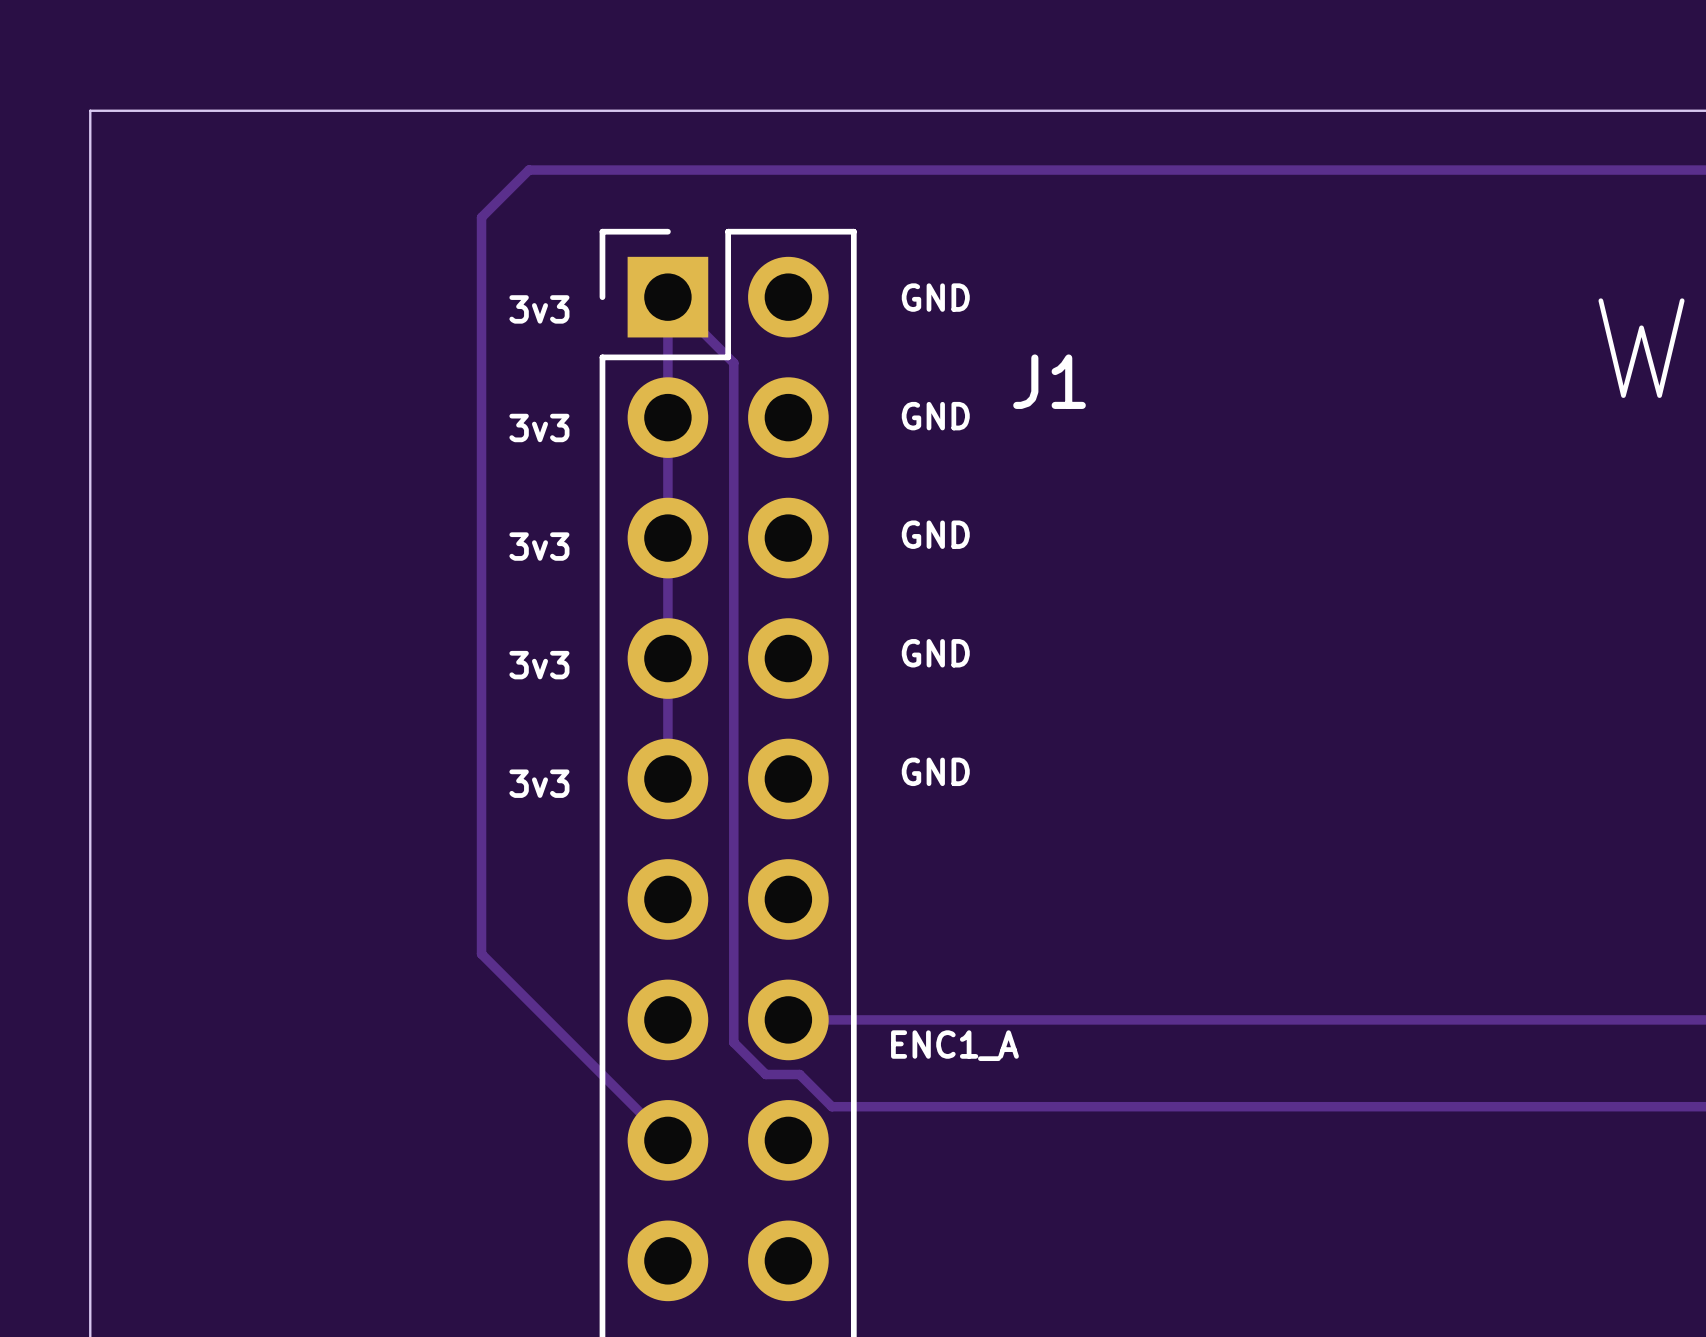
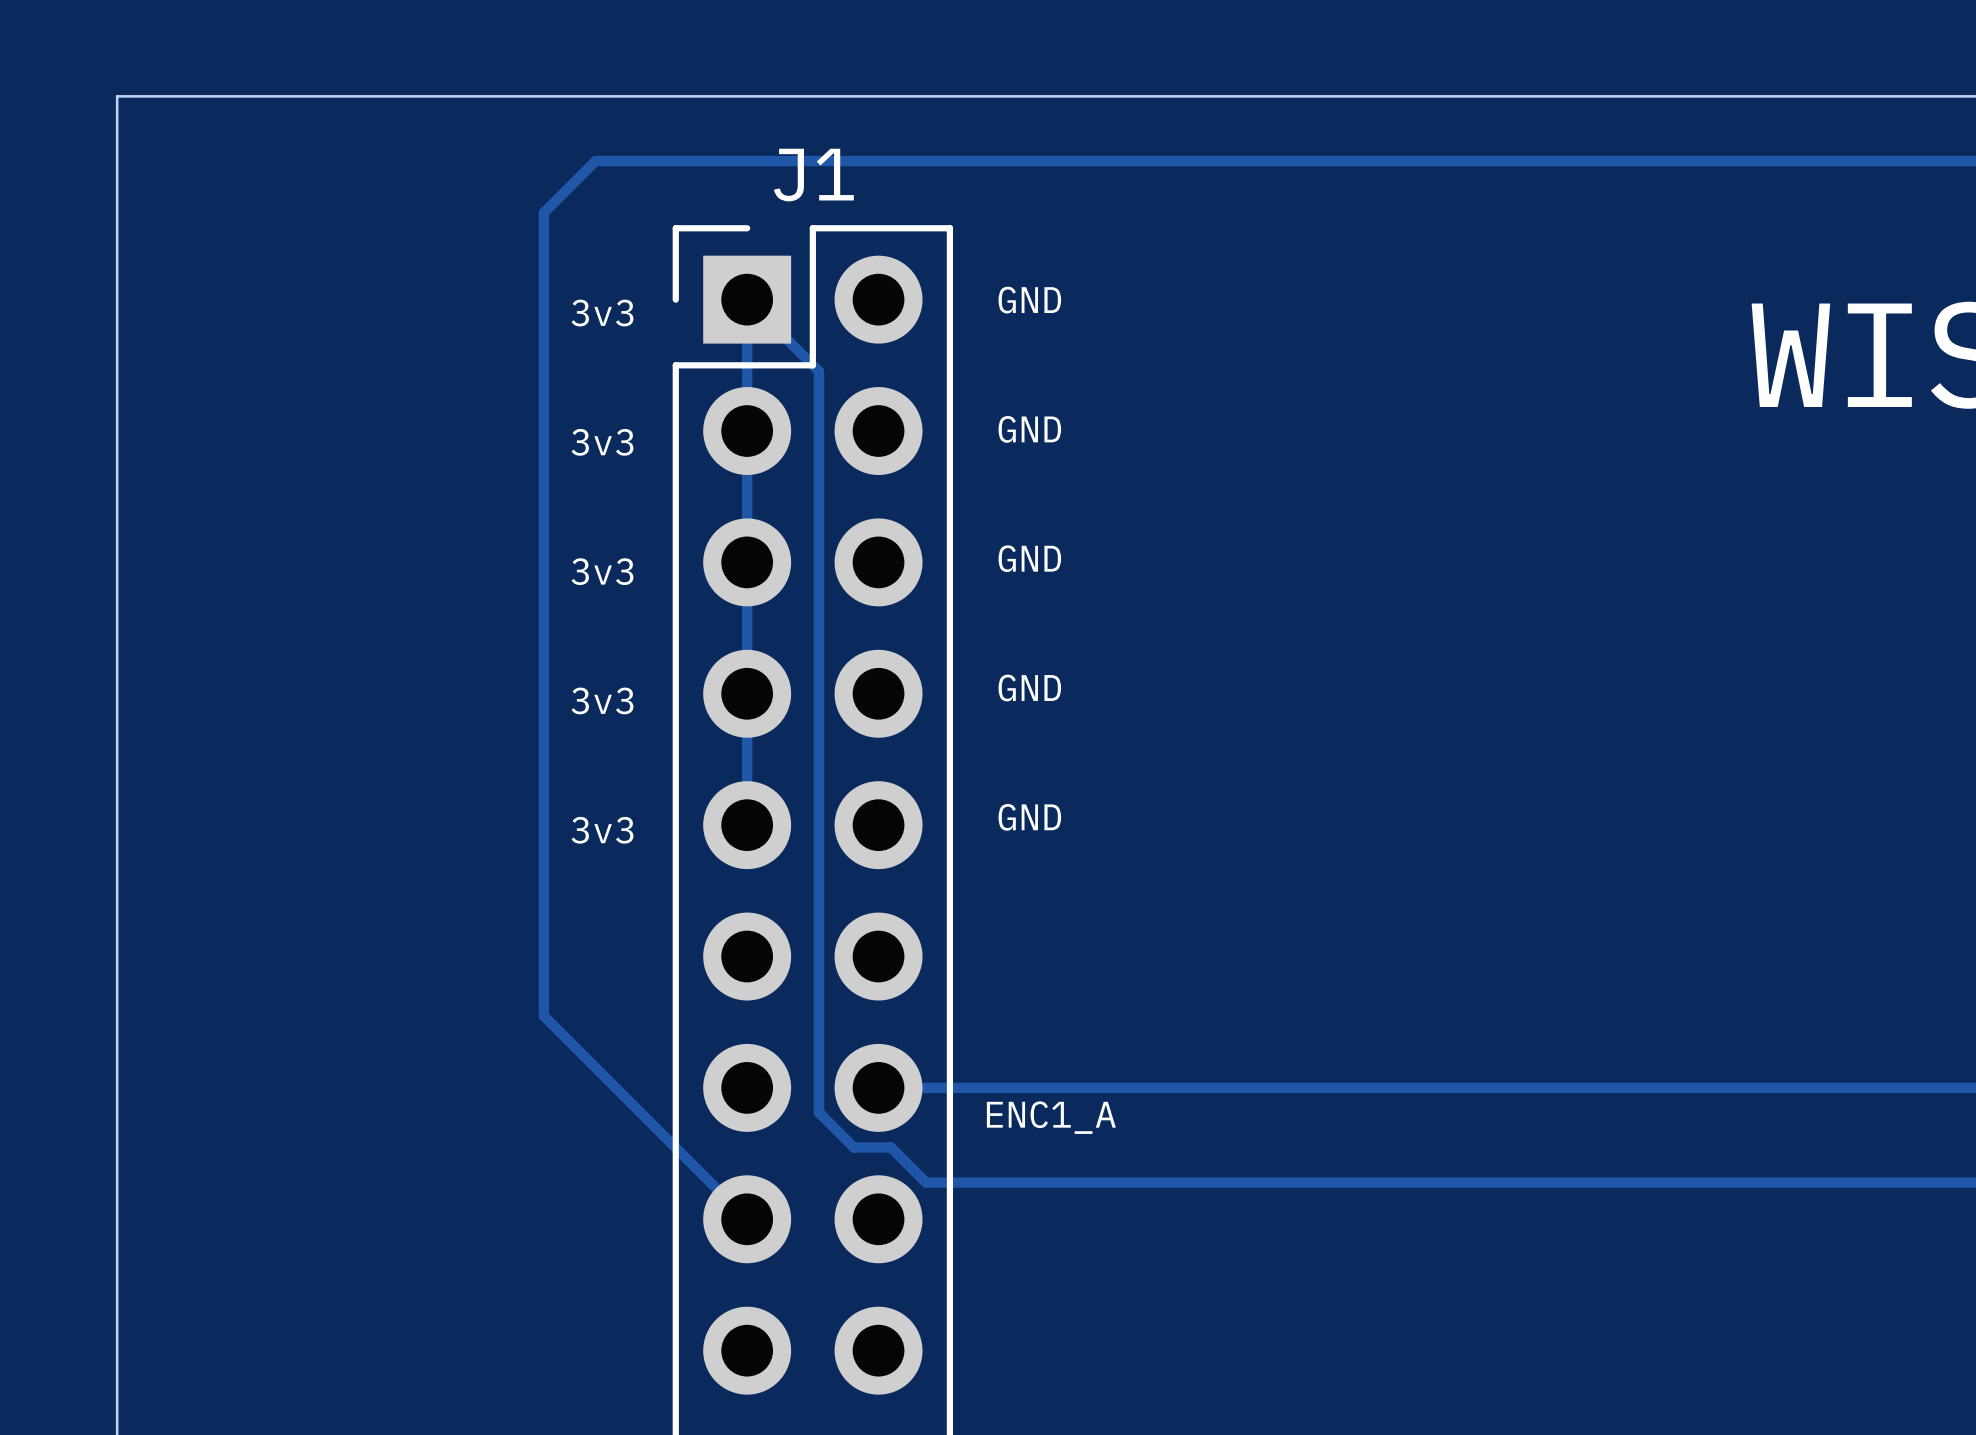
J1 name position: J1 (1049, 381) -> J1 (813, 175)

